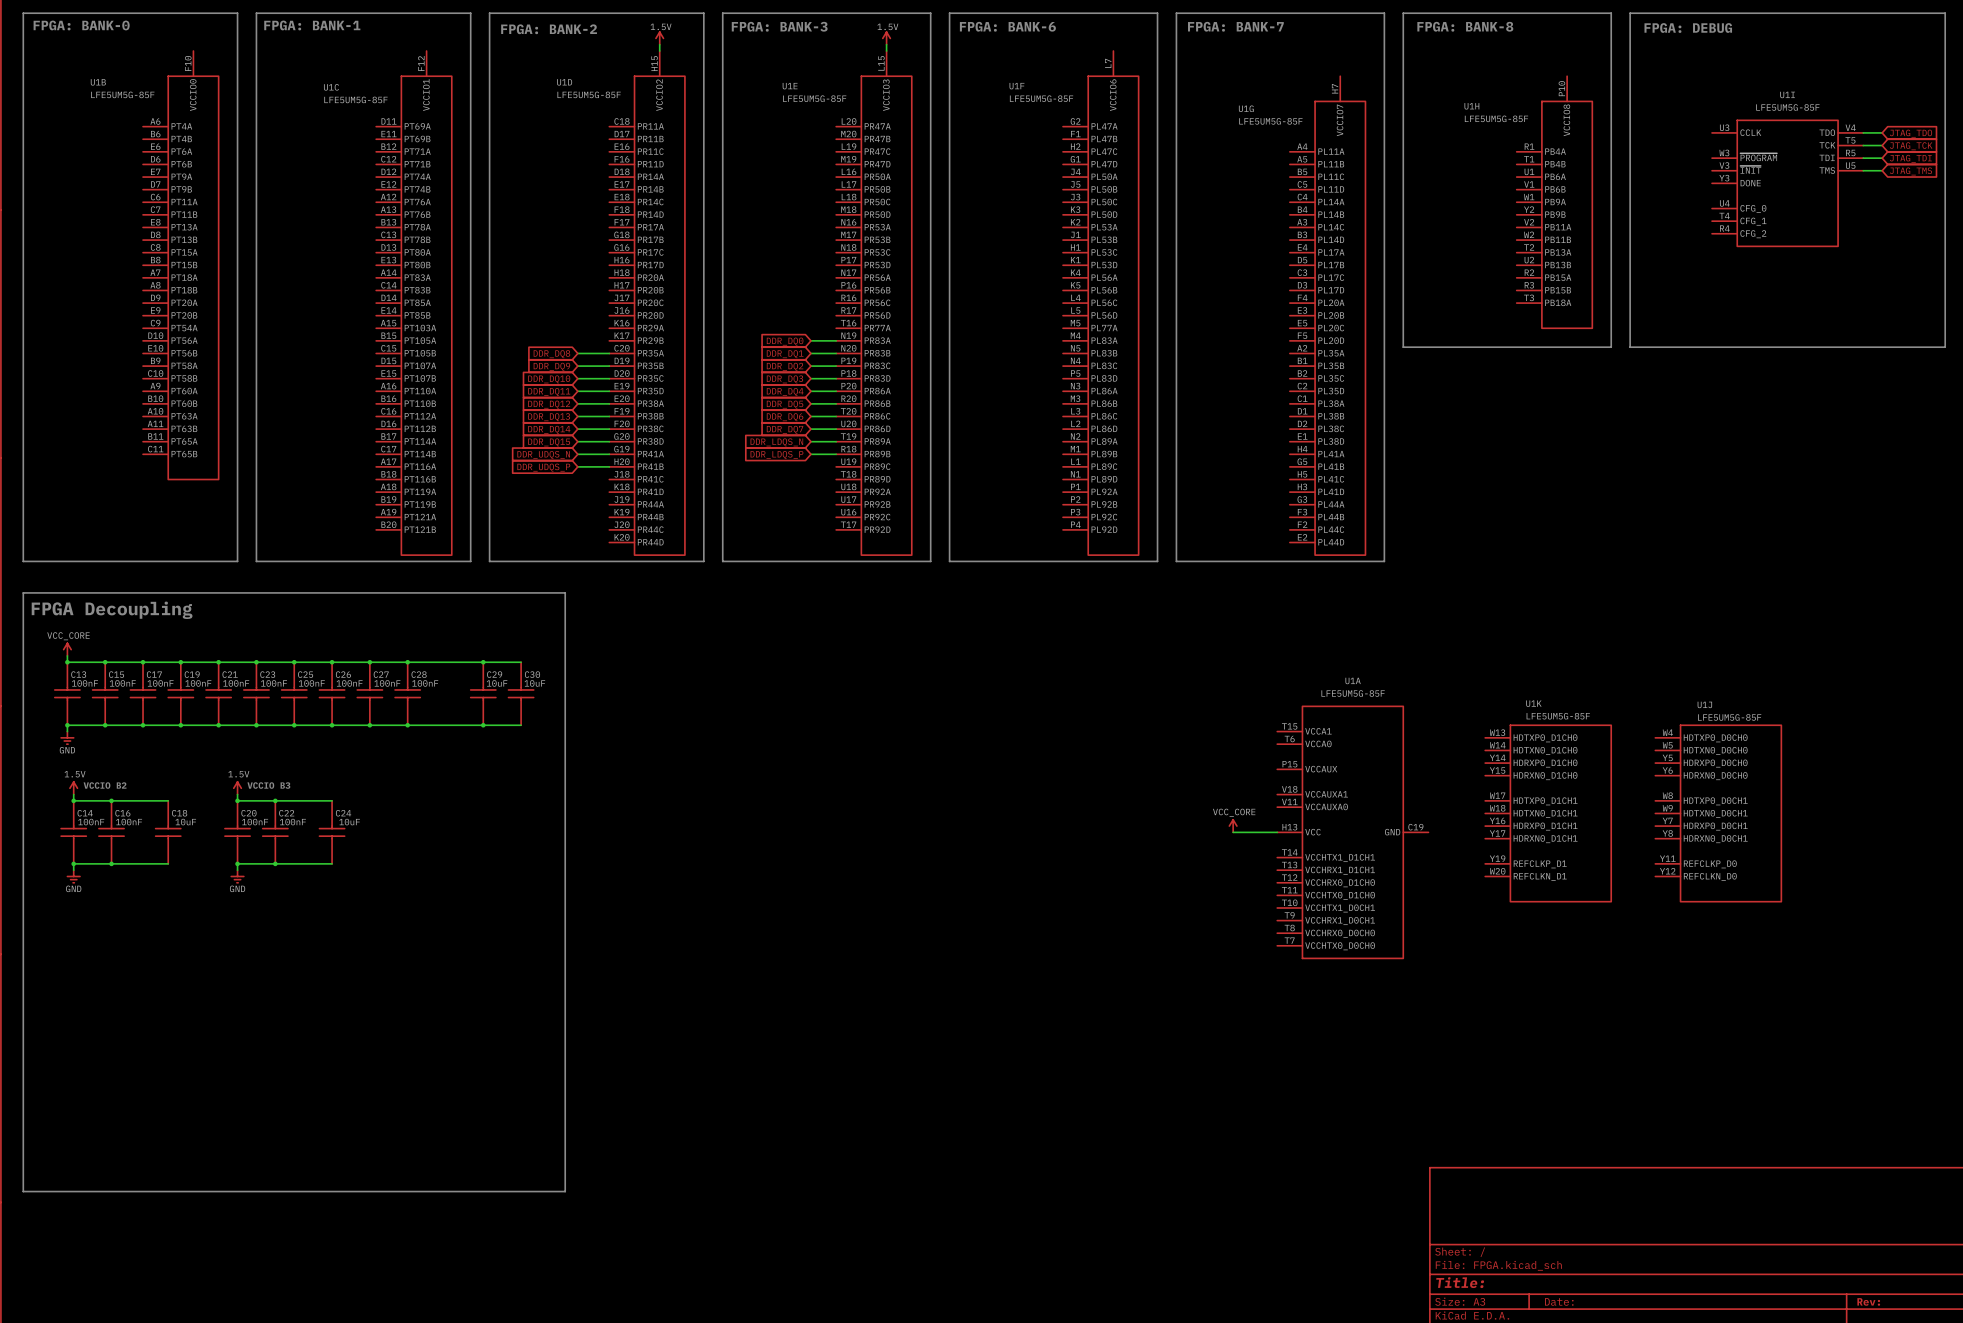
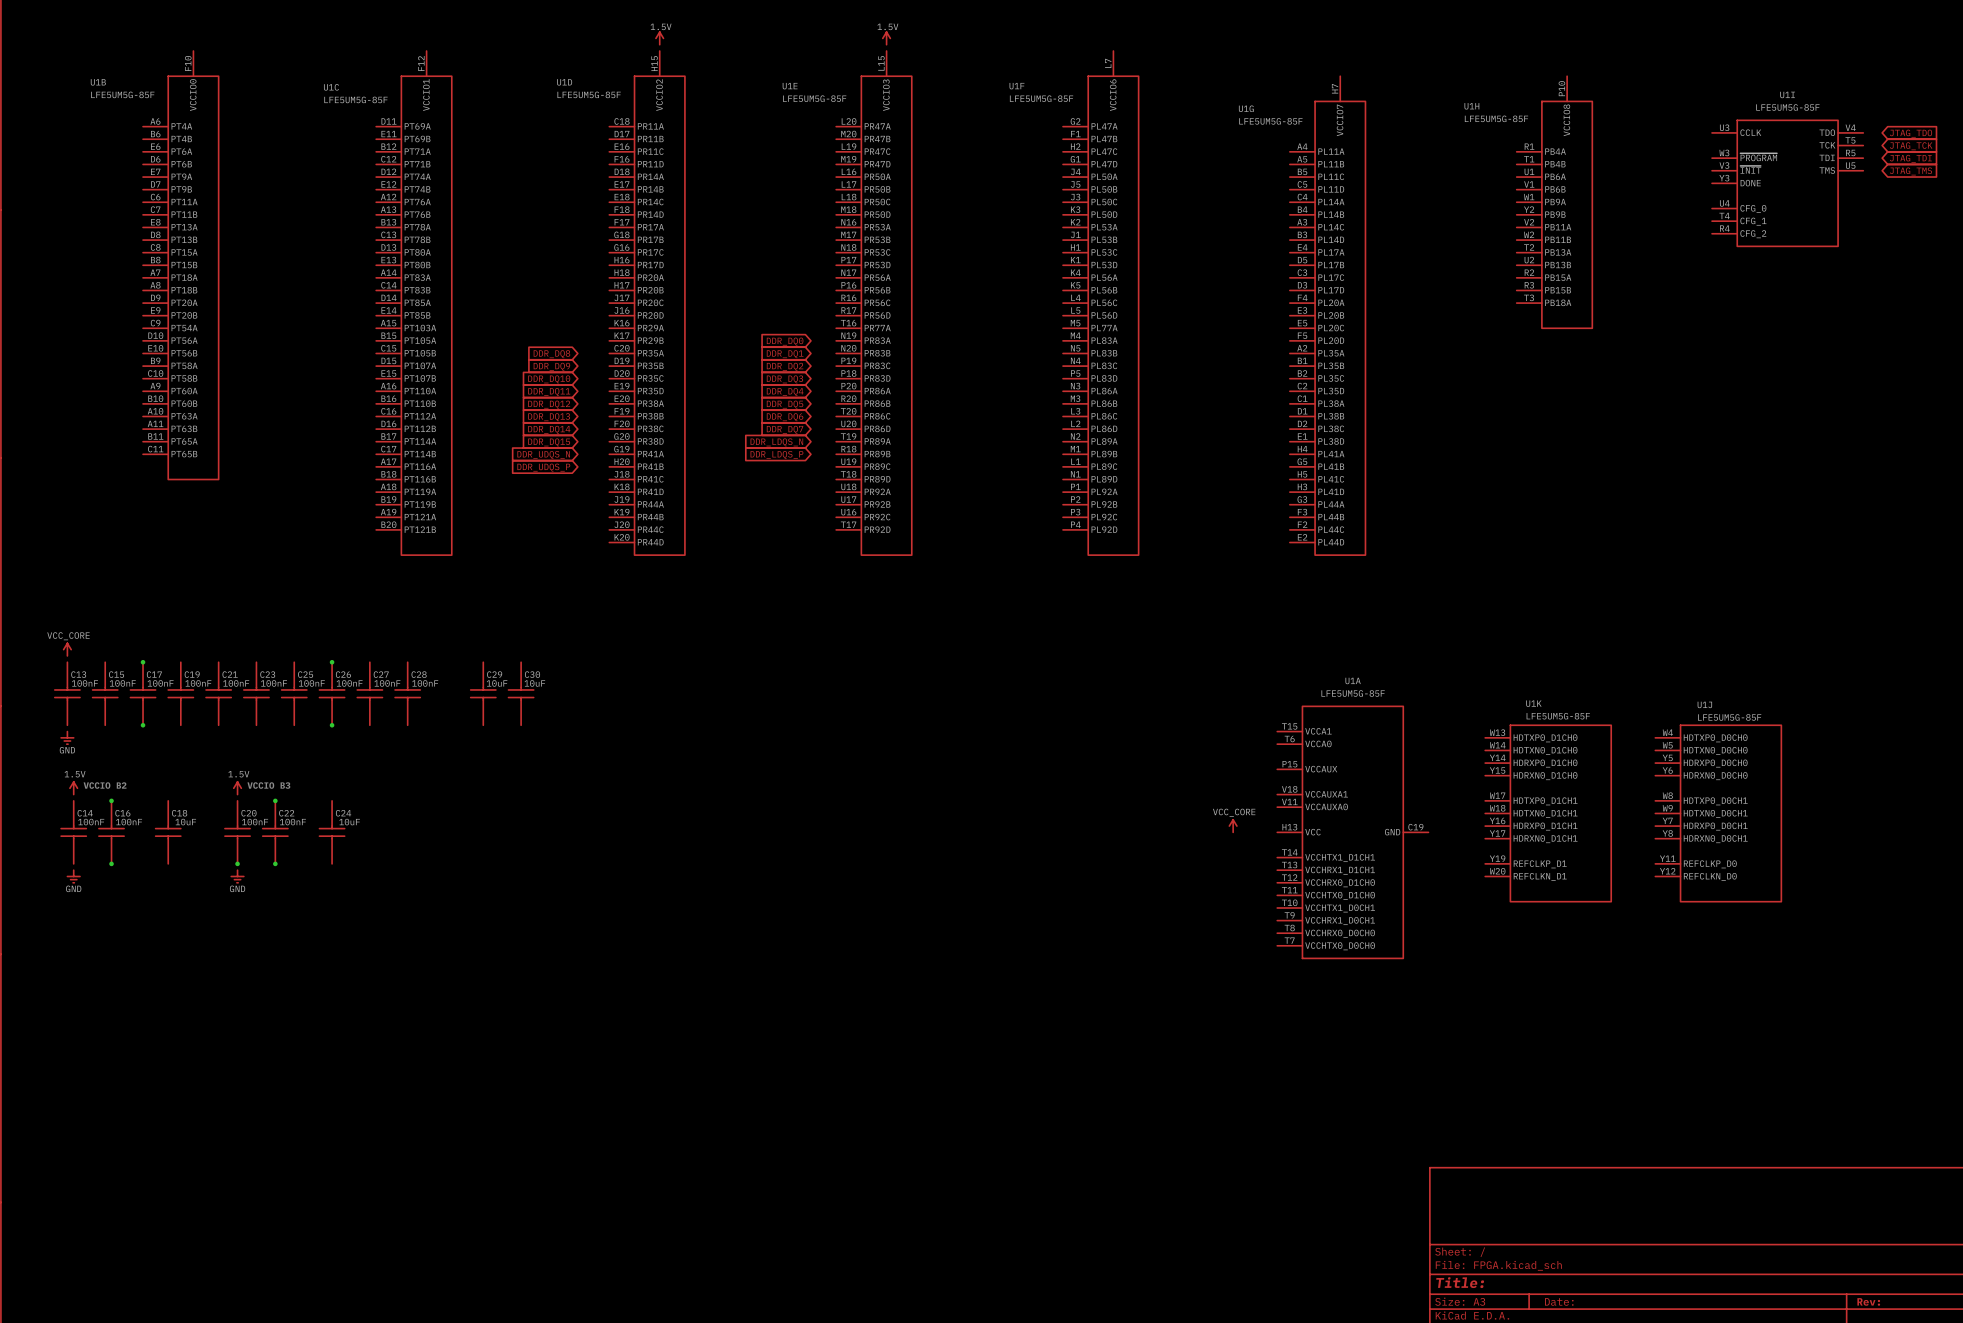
line: (23, 13) (237, 13) (237, 561) (23, 561) (23, 13) -> none
line: (256, 13) (470, 13) (470, 561) (256, 561) (256, 13) -> none
line: (489, 13) (703, 13) (703, 561) (489, 561) (489, 13) -> none
line: (722, 13) (930, 13) (930, 561) (722, 561) (722, 13) -> none
line: (949, 13) (1157, 13) (1157, 561) (949, 561) (949, 13) -> none
line: (1176, 13) (1384, 13) (1384, 561) (1176, 561) (1176, 13) -> none
line: (1403, 13) (1611, 13) (1611, 347) (1403, 347) (1403, 13) -> none
line: (1630, 13) (1945, 13) (1945, 347) (1630, 347) (1630, 13) -> none
text: FPGA: BANK-0 (81, 25) -> none
text: FPGA: BANK-1 (312, 25) -> none
text: FPGA: BANK-3 (779, 26) -> none
text: FPGA: BANK-6 (1007, 26) -> none
text: FPGA: BANK-7 (1235, 26) -> none
text: FPGA: BANK-8 (1465, 26) -> none
text: FPGA: DEBUG (1688, 28) -> none
text: FPGA: BANK-2 (549, 29) -> none
wire: (659, 44) (659, 51) -> none
wire: (886, 44) (886, 51) -> none
wire: (1863, 132) (1882, 132) -> none
wire: (1863, 145) (1882, 145) -> none
wire: (1863, 158) (1882, 158) -> none
wire: (1863, 170) (1882, 170) -> none
wire: (810, 340) (836, 340) -> none
wire: (577, 353) (609, 353) -> none
wire: (810, 353) (836, 353) -> none
wire: (577, 366) (609, 366) -> none
wire: (810, 366) (836, 366) -> none
wire: (577, 378) (609, 378) -> none
wire: (810, 378) (836, 378) -> none
wire: (577, 391) (609, 391) -> none
wire: (810, 391) (836, 391) -> none
wire: (577, 403) (609, 403) -> none
wire: (810, 403) (836, 403) -> none
wire: (577, 416) (609, 416) -> none
wire: (810, 416) (836, 416) -> none
wire: (577, 429) (609, 429) -> none
wire: (810, 429) (836, 429) -> none
wire: (577, 441) (609, 441) -> none
wire: (810, 441) (836, 441) -> none
wire: (577, 454) (609, 454) -> none
wire: (810, 454) (836, 454) -> none
wire: (577, 466) (609, 466) -> none
line: (23, 592) (23, 1191) (565, 1191) (565, 592) (23, 592) -> none
text: FPGA Decoupling (112, 610) -> none
wire: (67, 655) (67, 662) (521, 662) -> none
junction: (67, 662) -> none
junction: (105, 662) -> none
junction: (180, 662) -> none
junction: (218, 662) -> none
junction: (256, 662) -> none
junction: (294, 662) -> none
junction: (369, 662) -> none
junction: (407, 662) -> none
junction: (483, 662) -> none
junction: (67, 725) -> none
junction: (105, 725) -> none
junction: (180, 725) -> none
junction: (218, 725) -> none
junction: (256, 725) -> none
junction: (294, 725) -> none
junction: (369, 725) -> none
junction: (407, 725) -> none
junction: (483, 725) -> none
wire: (521, 725) (67, 725) (67, 731) -> none
wire: (73, 794) (73, 800) (168, 800) -> none
wire: (237, 794) (237, 800) (332, 800) -> none
junction: (73, 800) -> none
junction: (237, 800) -> none
wire: (1233, 832) (1277, 832) -> none
junction: (73, 863) -> none
wire: (168, 863) (73, 863) (73, 870) -> none
wire: (332, 863) (237, 863) (237, 870) -> none

